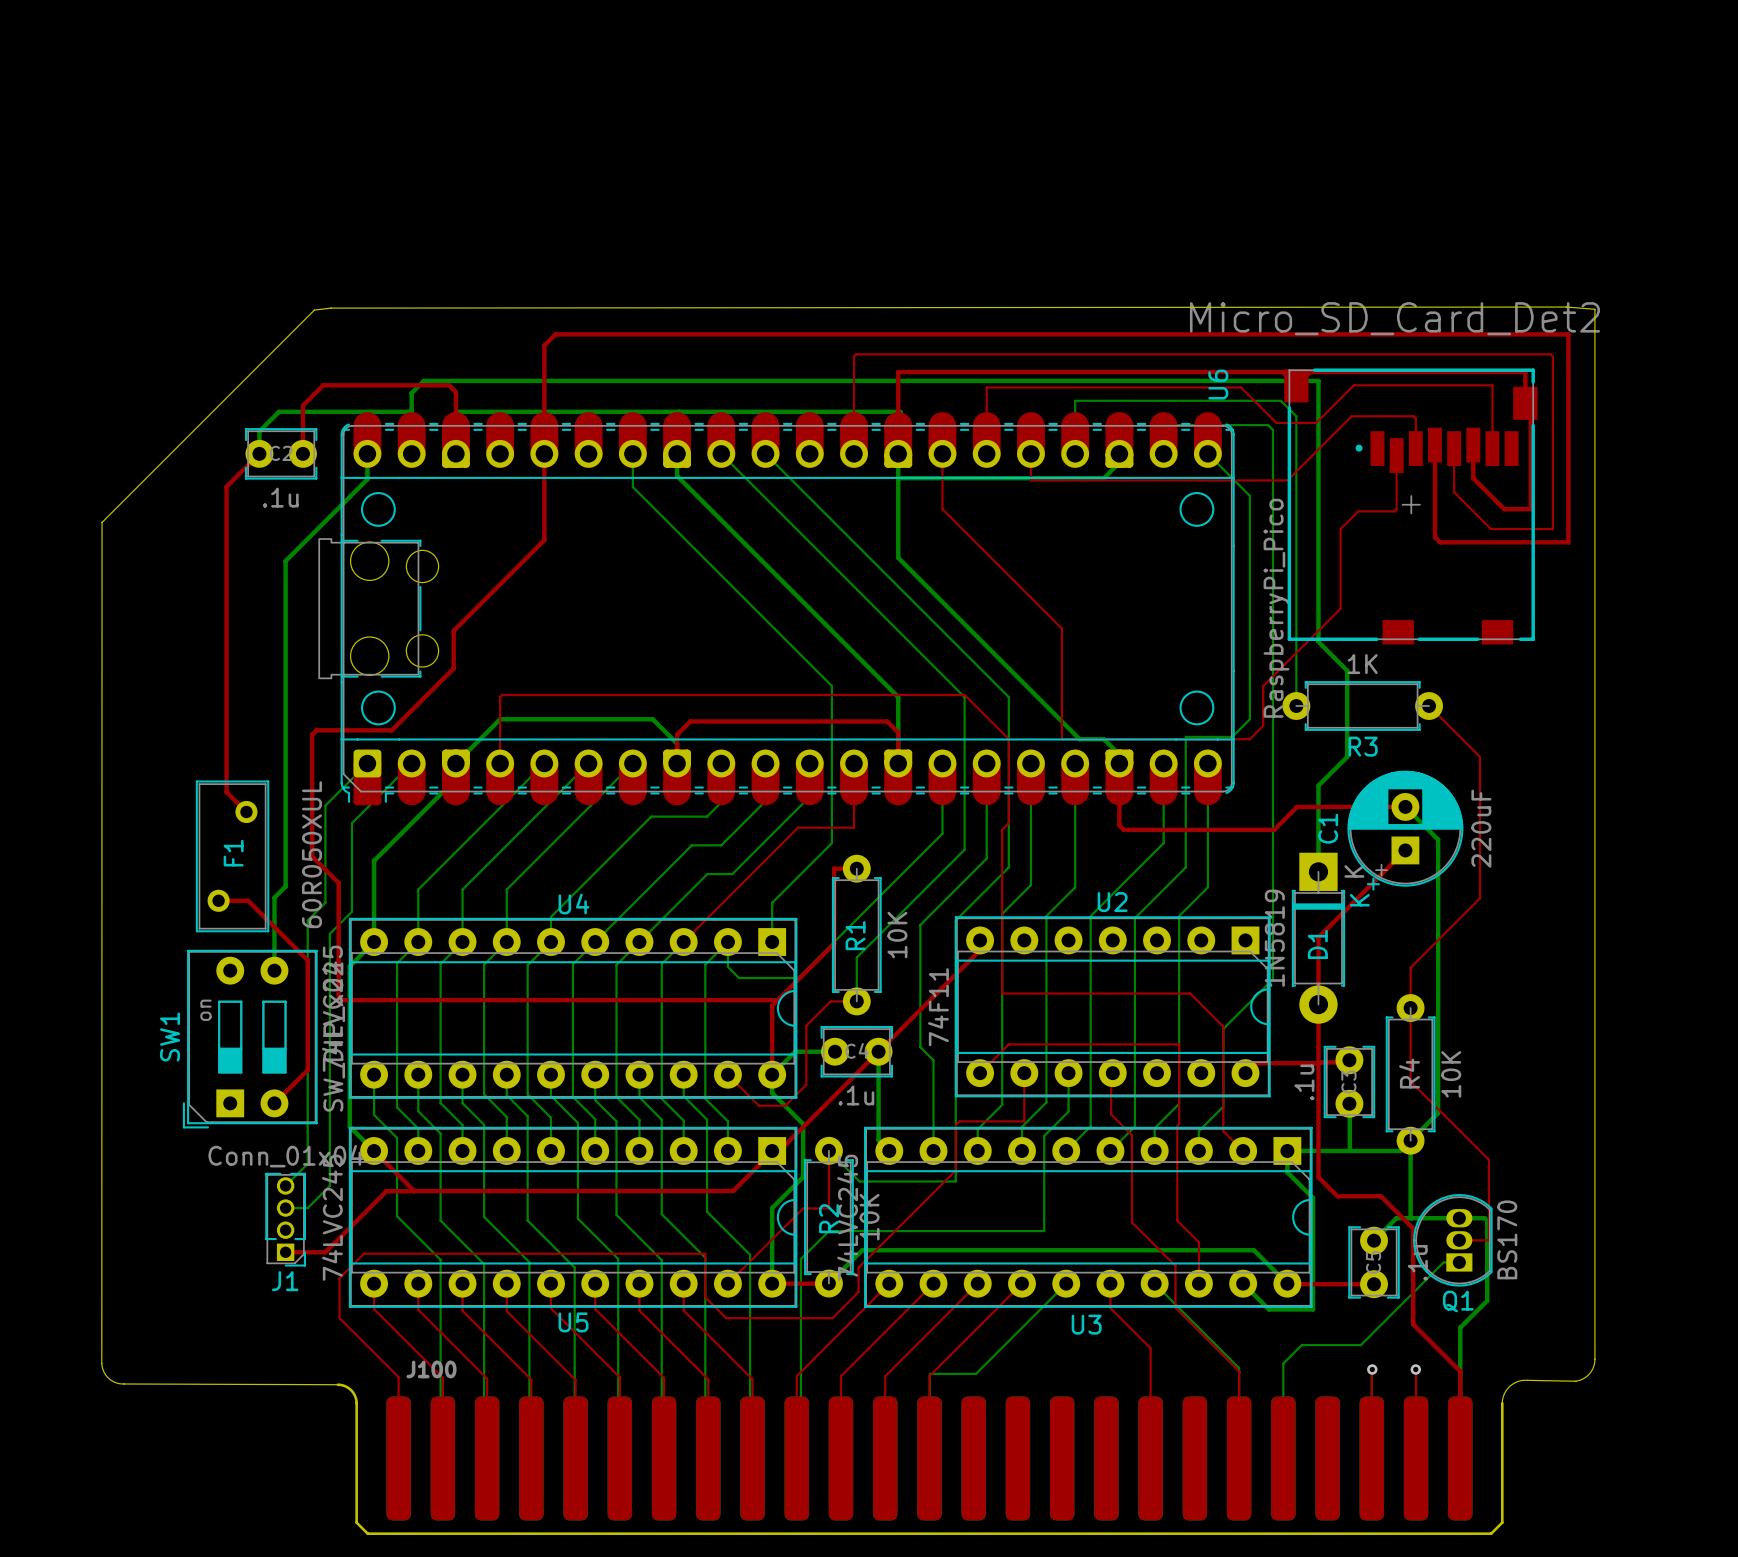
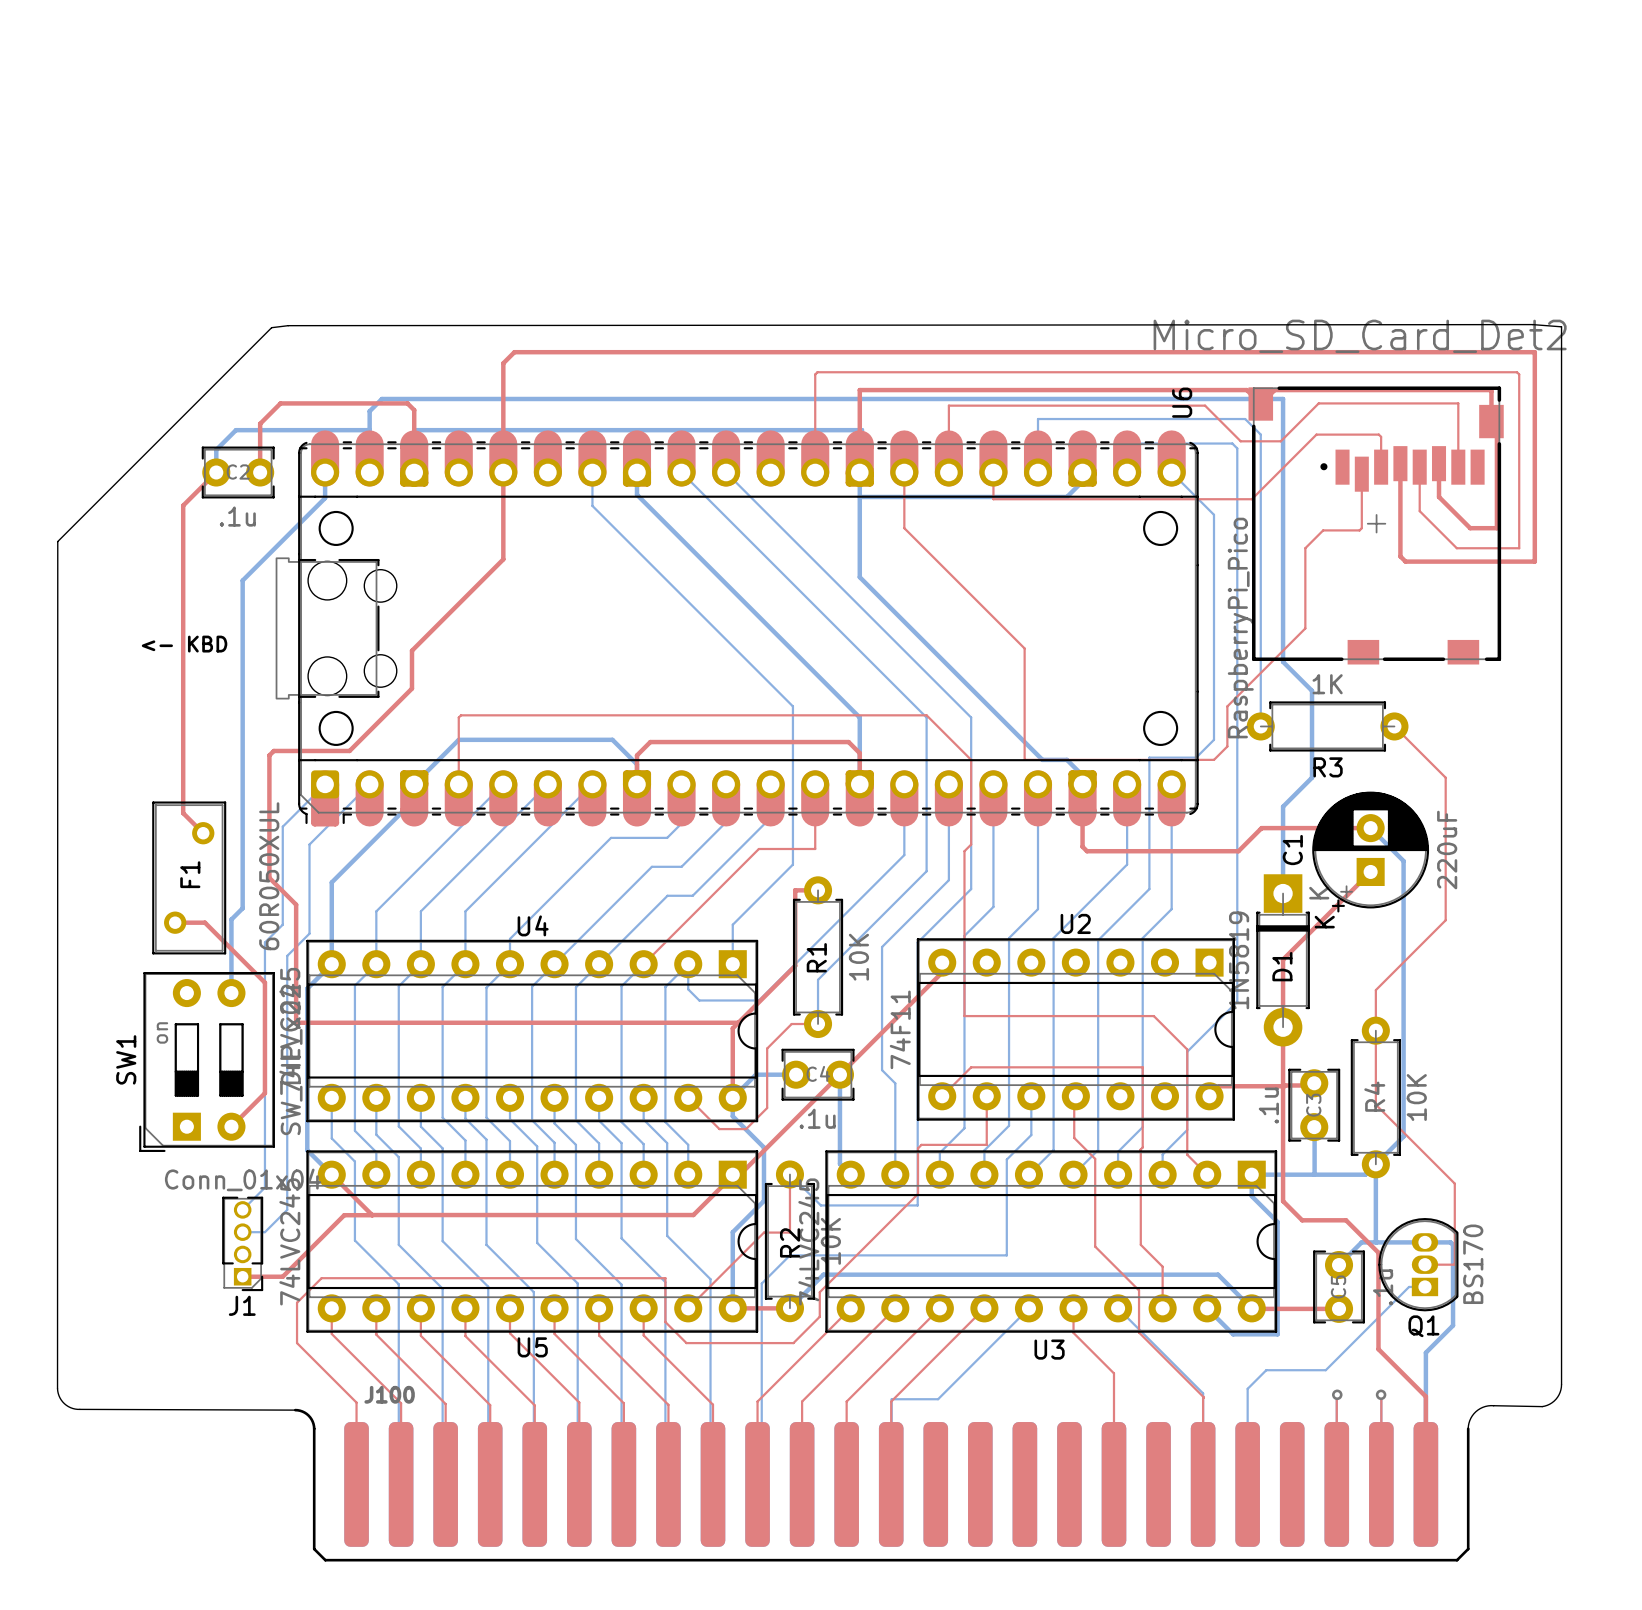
text: none -> <- KBD (184, 644)

